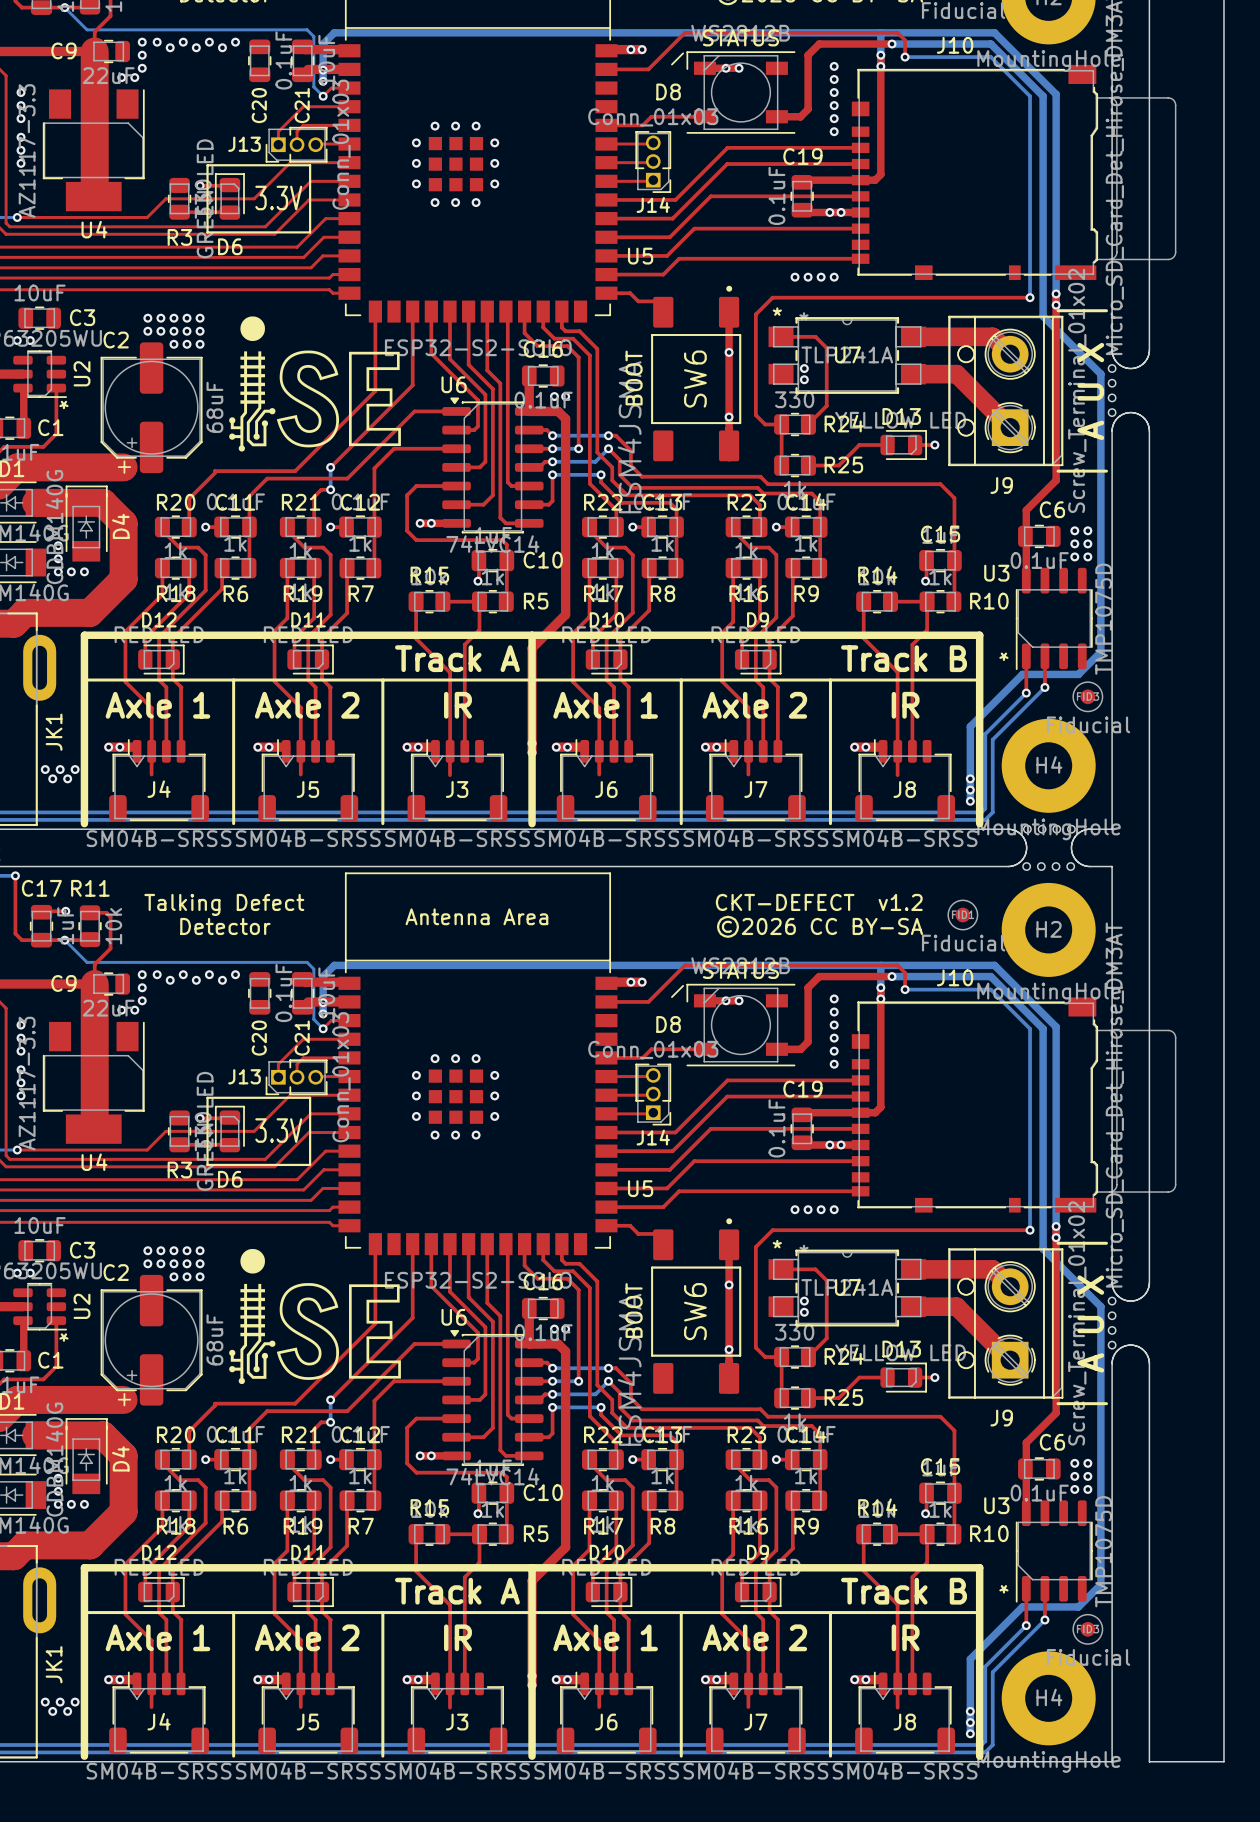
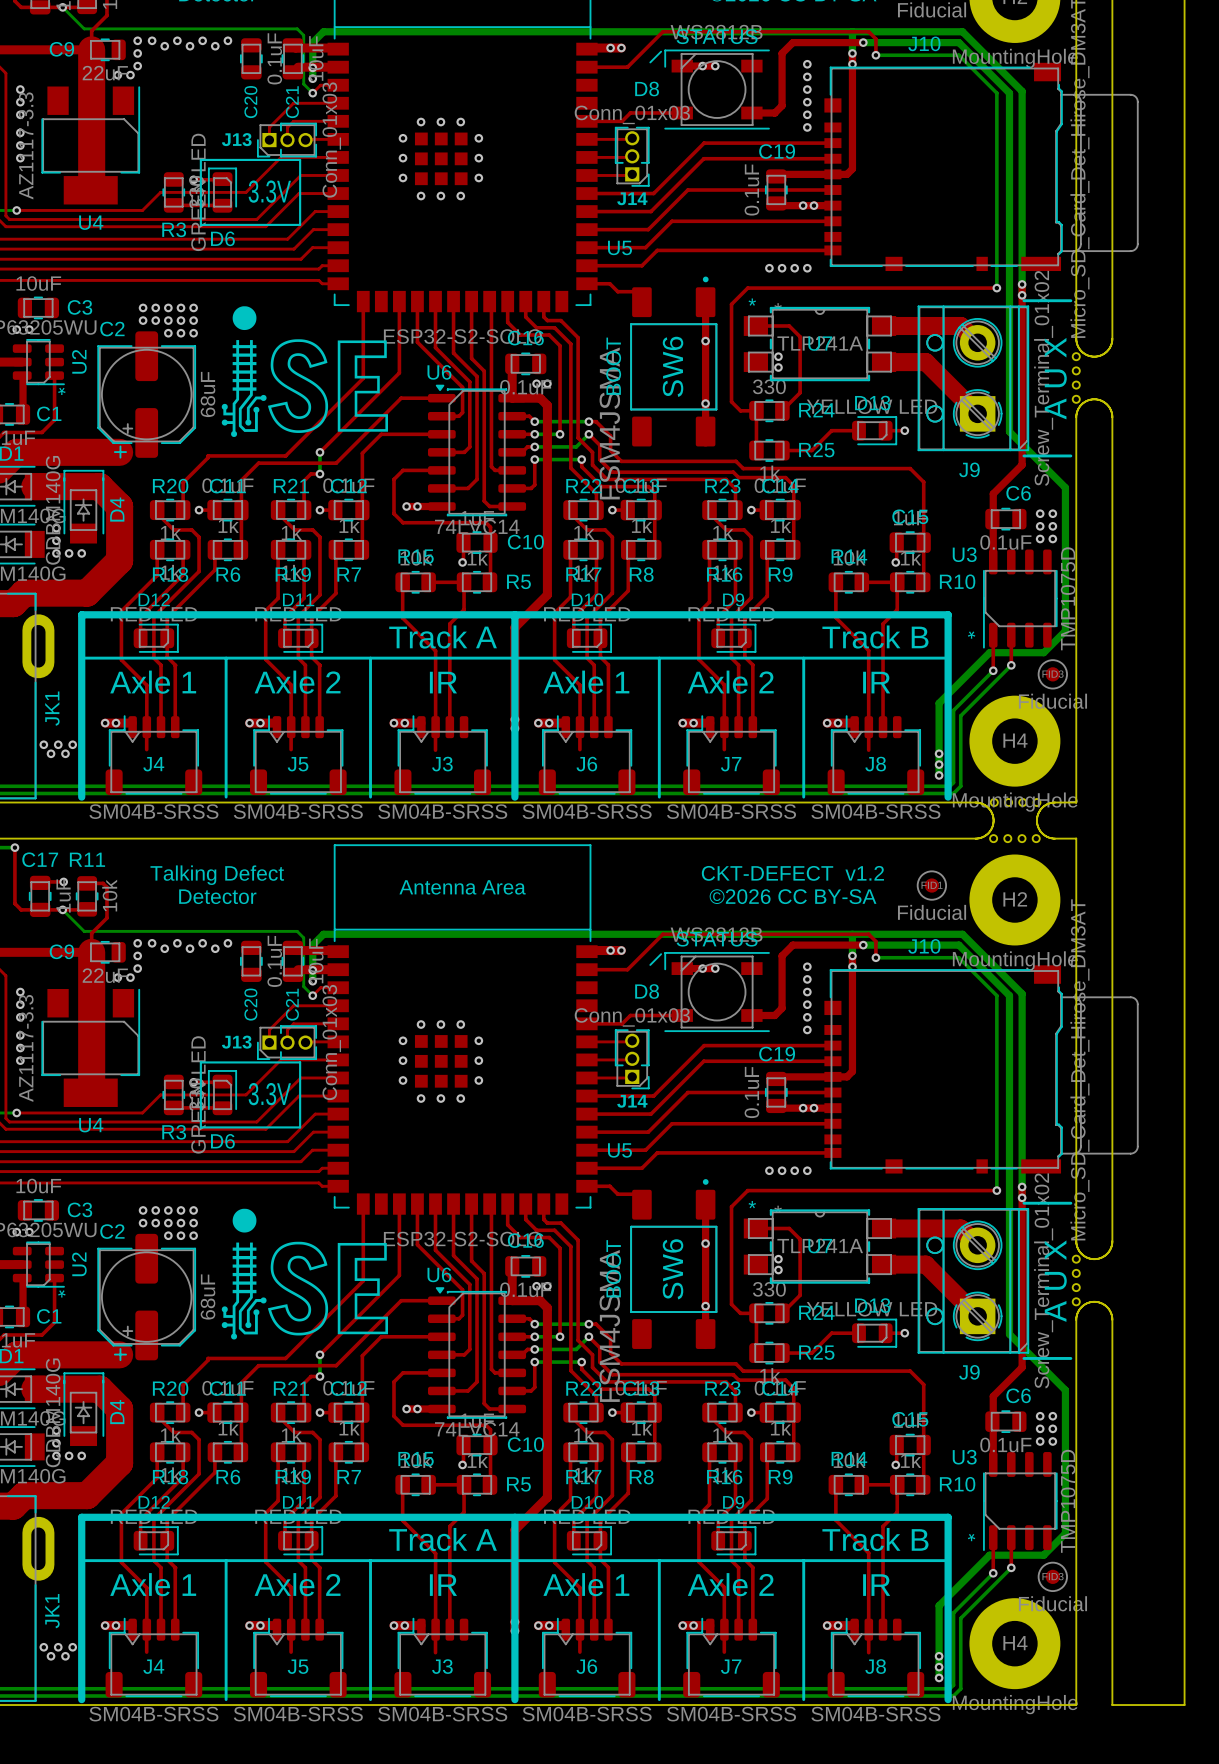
bottom track: (1043, 316) (1100, 374) (1100, 503) -> (1009, 306) (1009, 431) (1065, 487)
bottom track: (1043, 1248) (1100, 1306) (1100, 1436) -> (1009, 1208) (1009, 1334) (1065, 1390)

